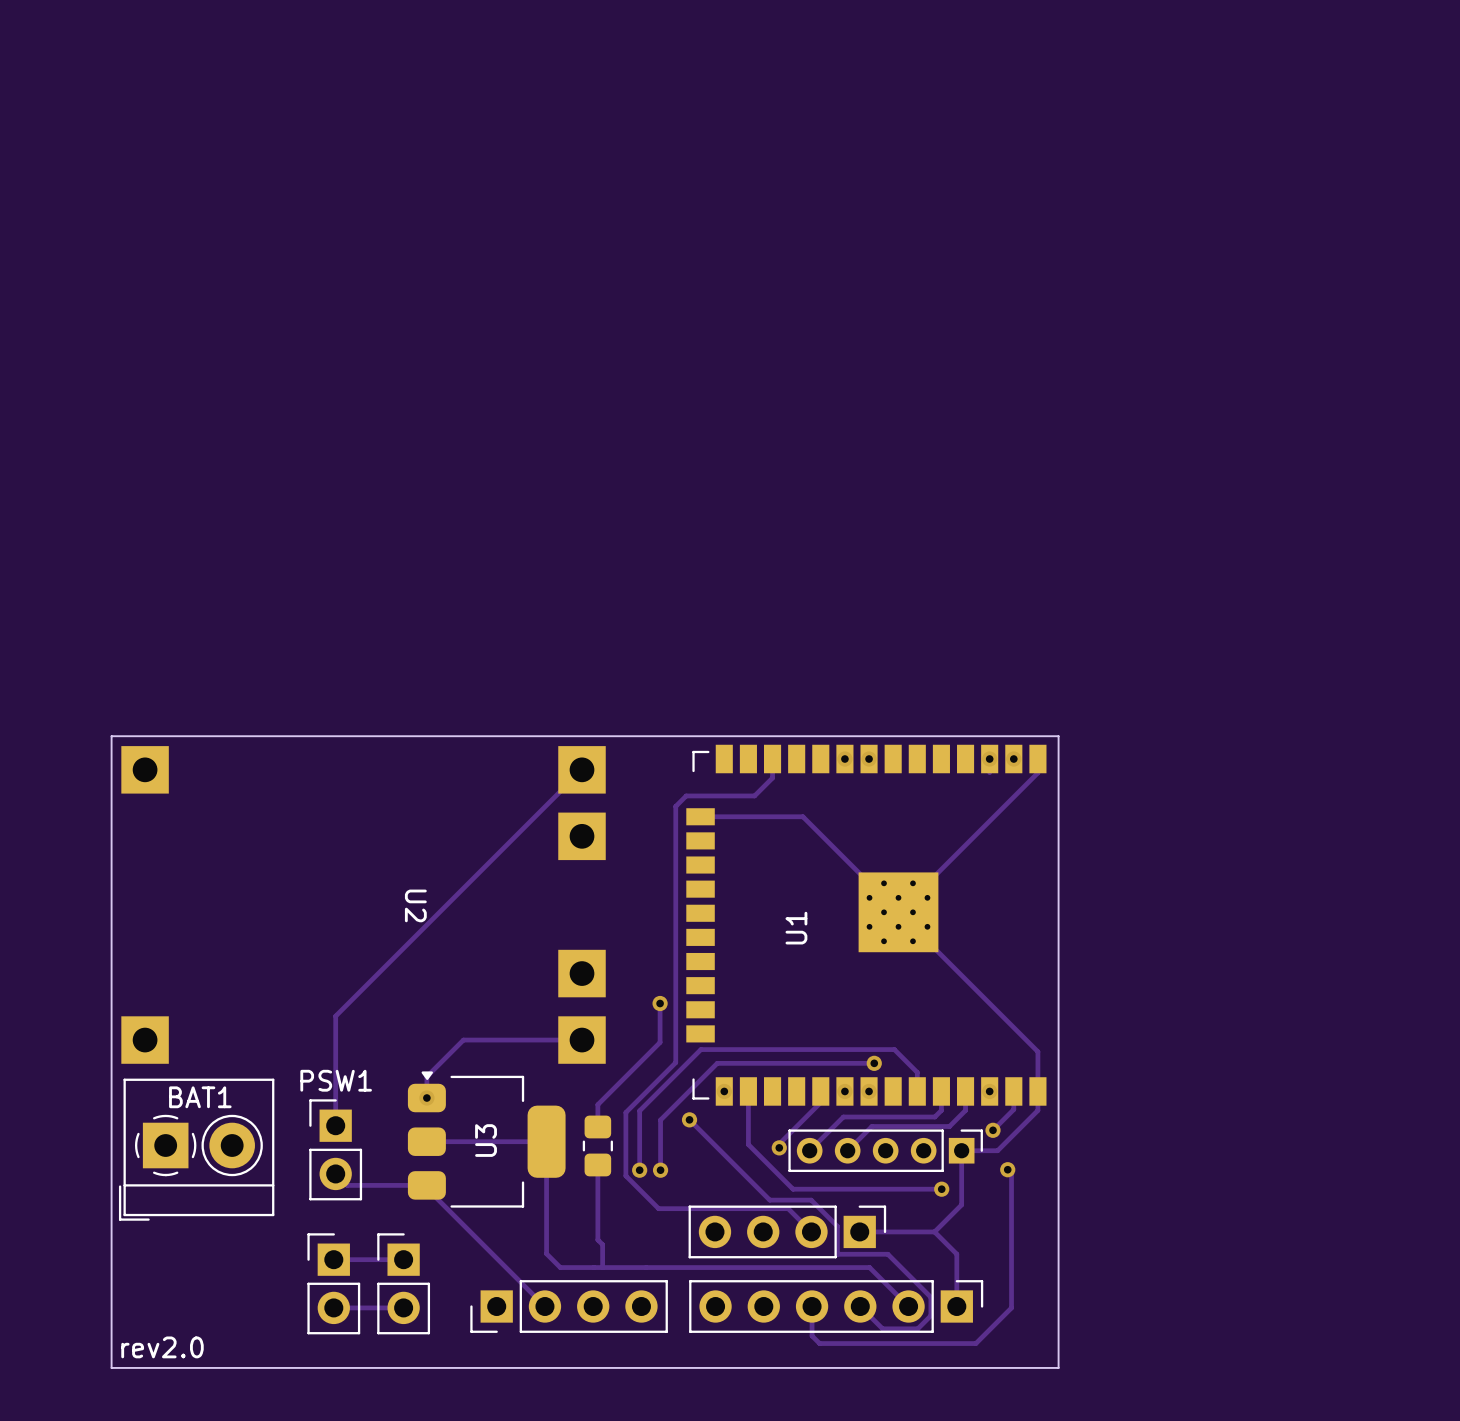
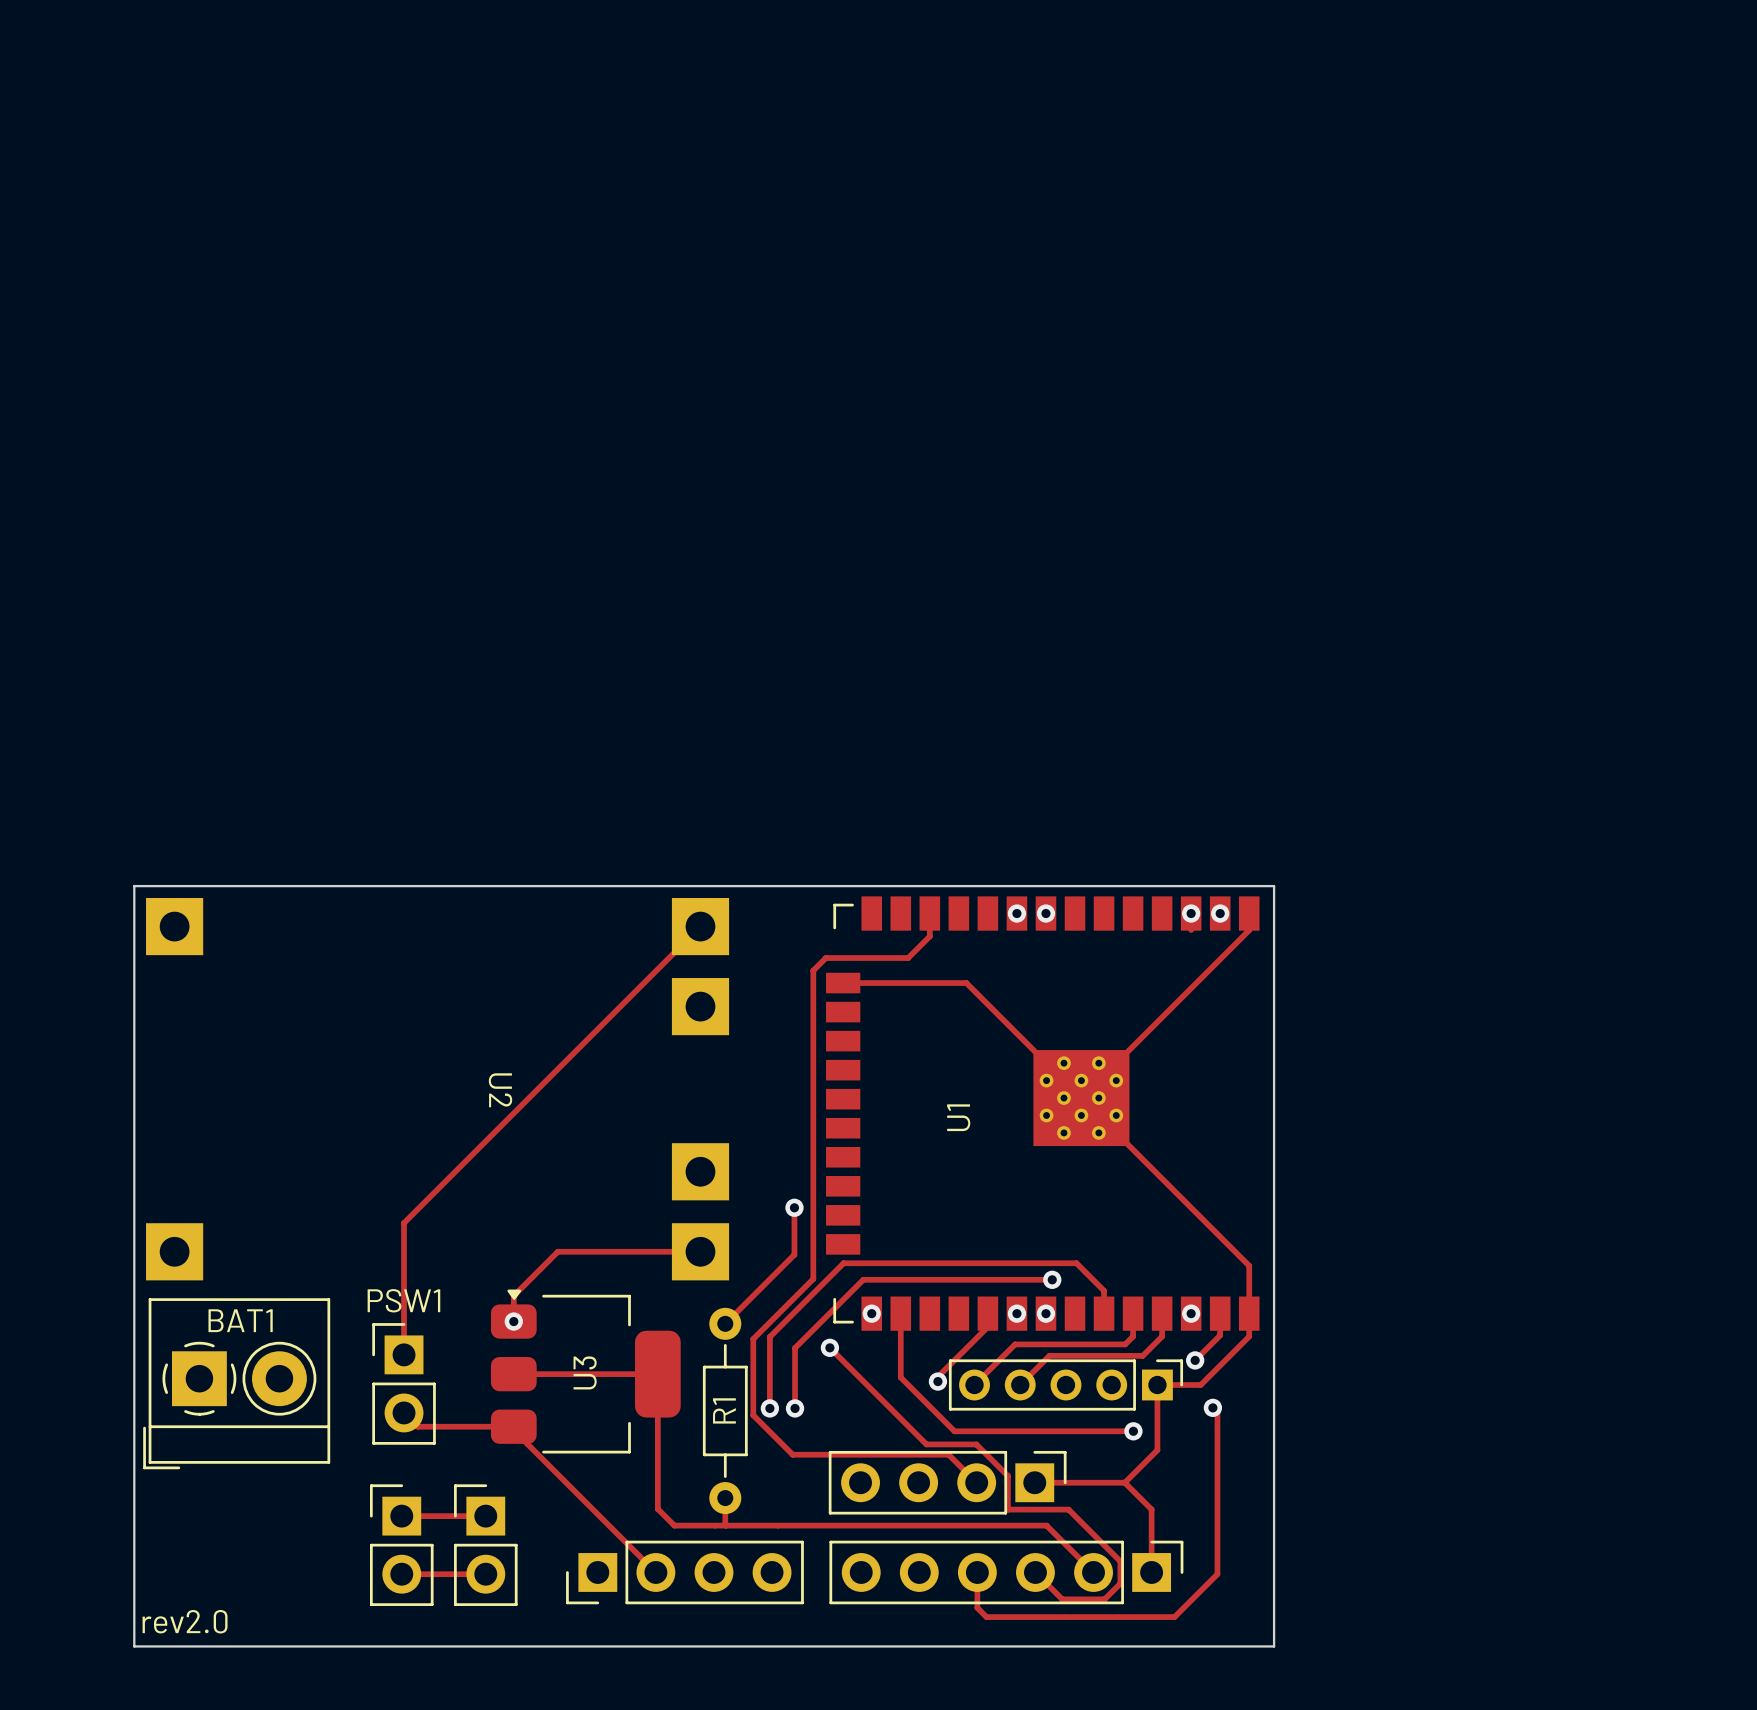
track: (602, 1099) (597, 1104) (597, 1126) -> none
part: (597, 1145) -> none
track: (597, 1164) (597, 1239) (602, 1244) -> none
R1: none -> (725, 1410)

